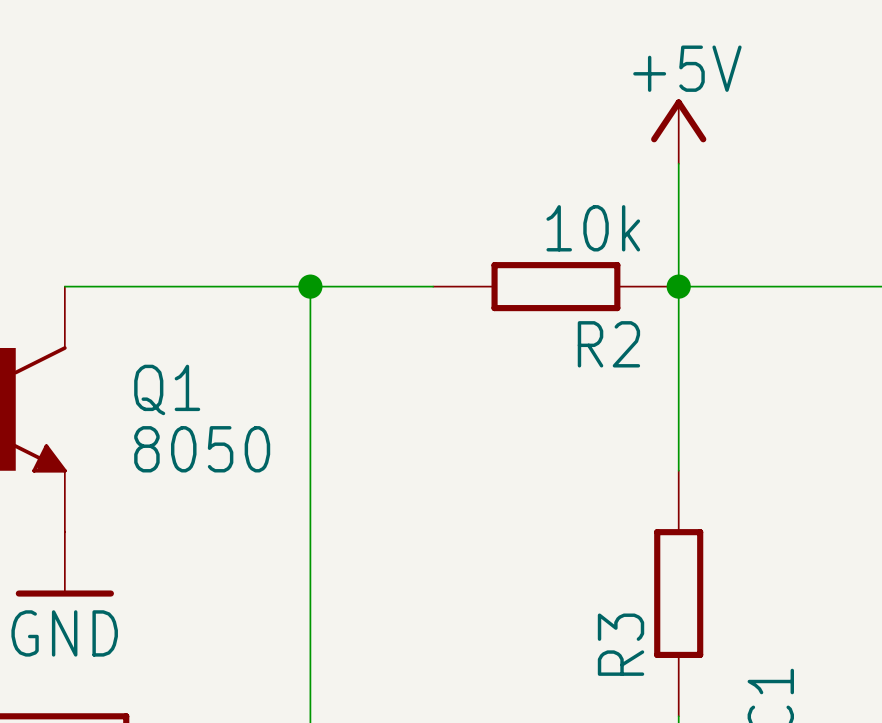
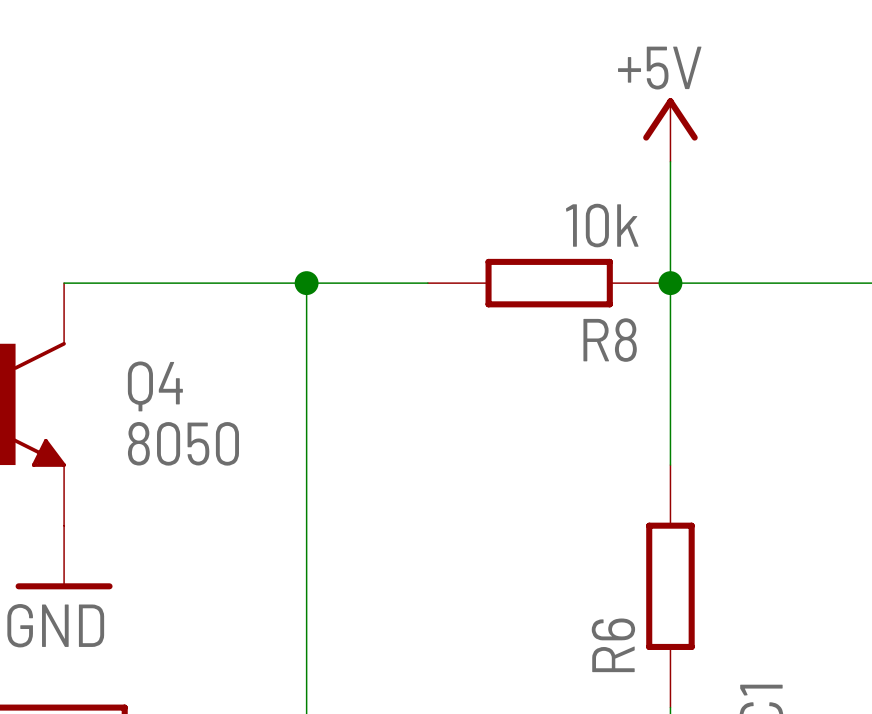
R2 name: R2 (608, 344) -> R8 (610, 340)
Q1 name: Q1 (167, 389) -> Q4 (155, 386)
R3 name: R3 (621, 644) -> R6 (613, 645)

